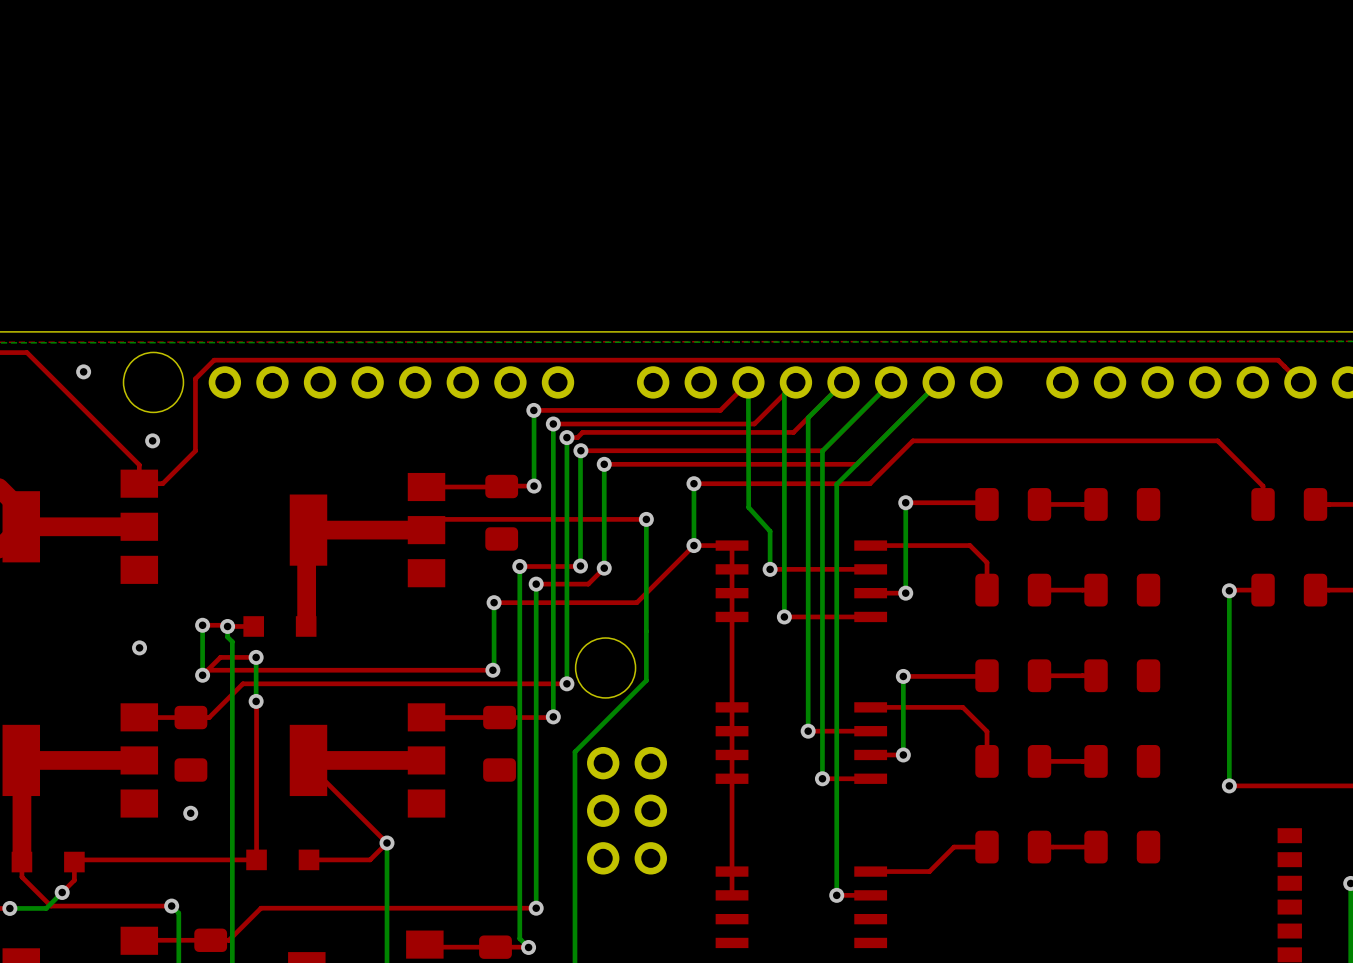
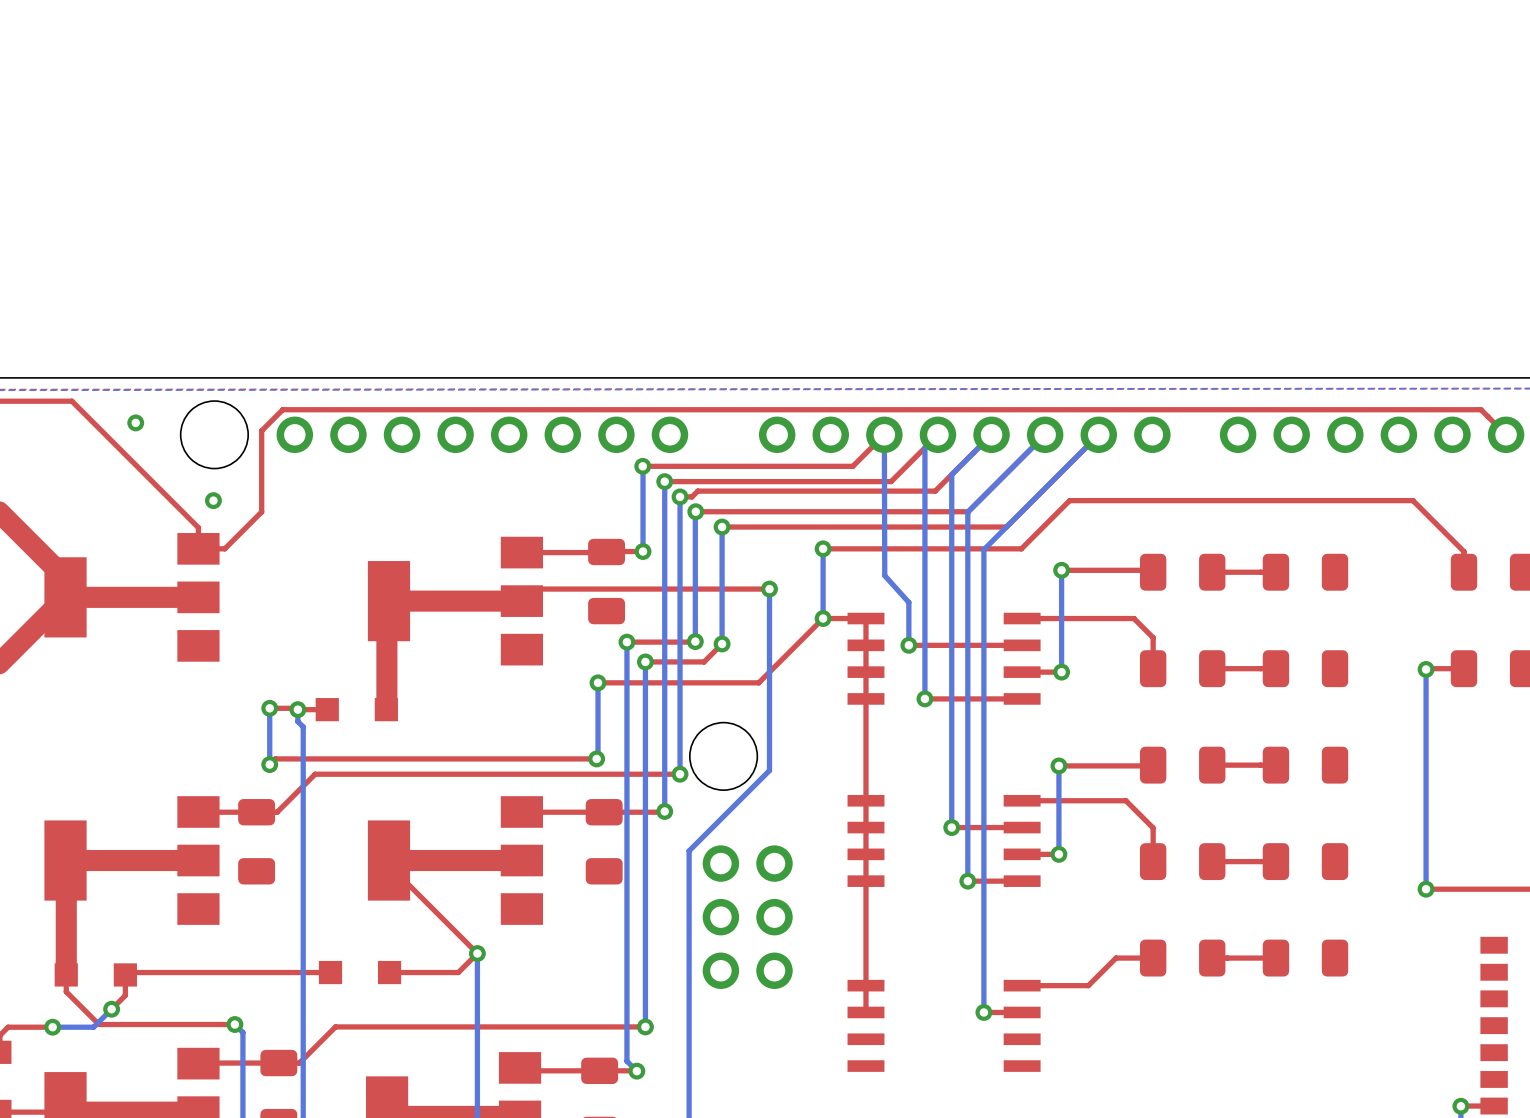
via: (139, 647) -> none
top track: (256, 657) (220, 657) (207, 670) -> none
bottom track: (256, 657) (256, 701) -> none
via: (256, 657) -> none
top track: (256, 701) (256, 859) -> none
via: (256, 701) -> none
via: (190, 813) -> none

